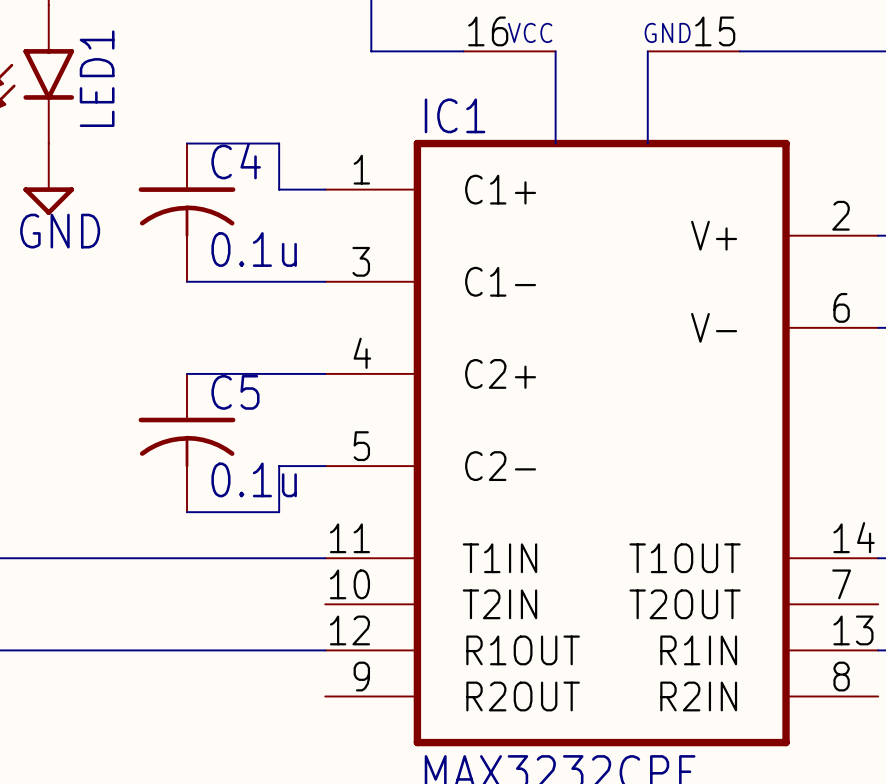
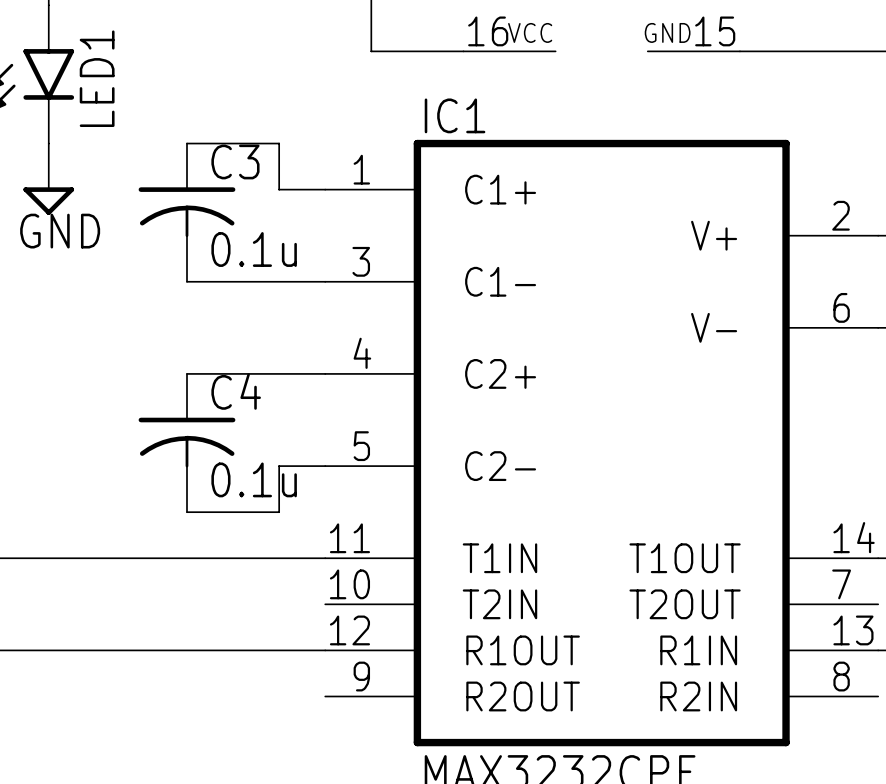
wire: (555, 51) (555, 143) -> none
wire: (647, 51) (647, 143) -> none
C4 name: C4 (236, 161) -> C3 (235, 161)
C5 name: C5 (235, 392) -> C4 (236, 391)

